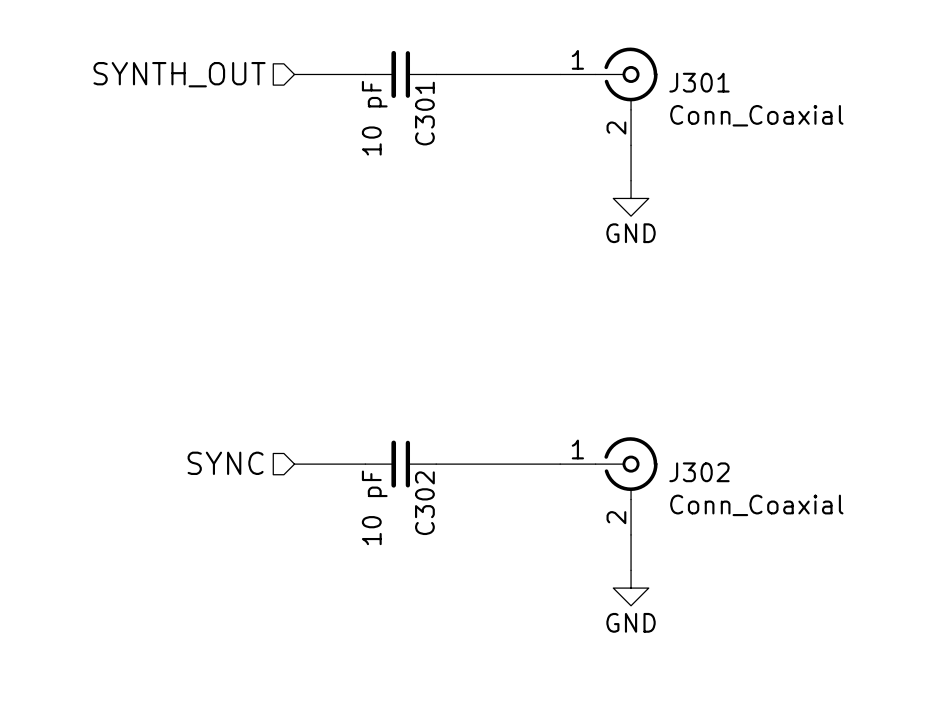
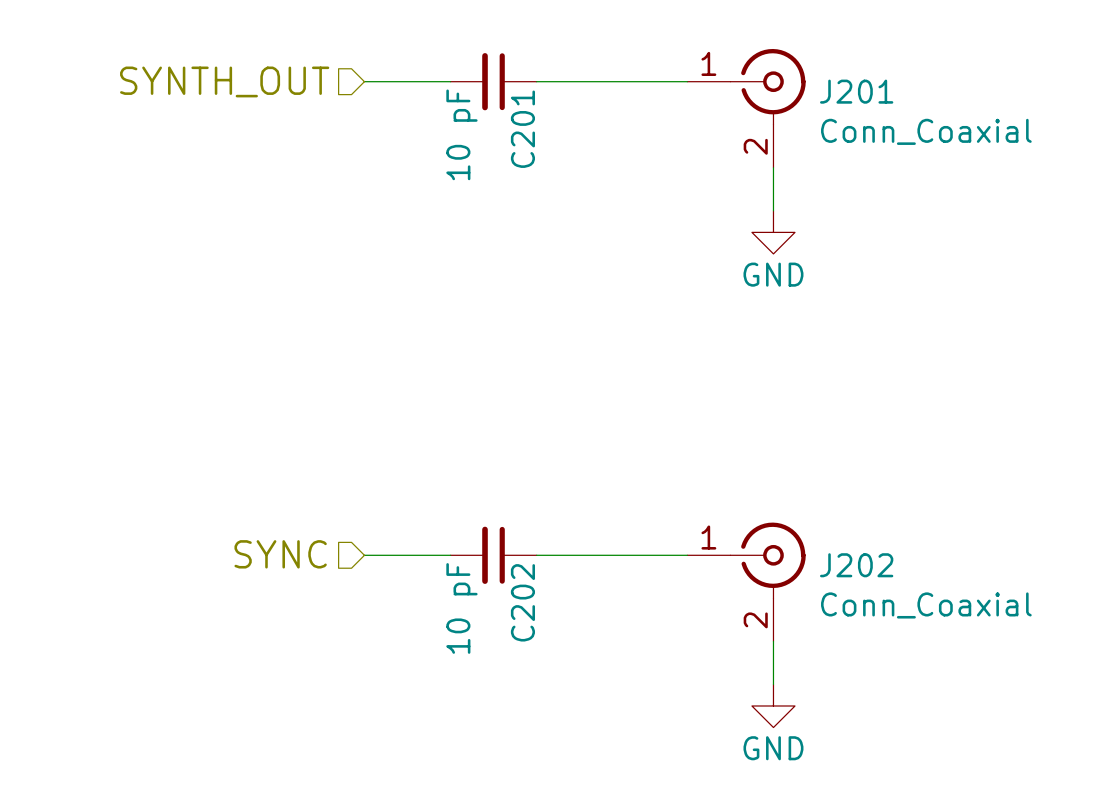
J301 name: J301 (699, 82) -> J201 (856, 91)
C301 name: C301 (424, 113) -> C201 (522, 129)
J302 name: J302 (699, 472) -> J202 (856, 565)
C302 name: C302 (424, 503) -> C202 (522, 602)

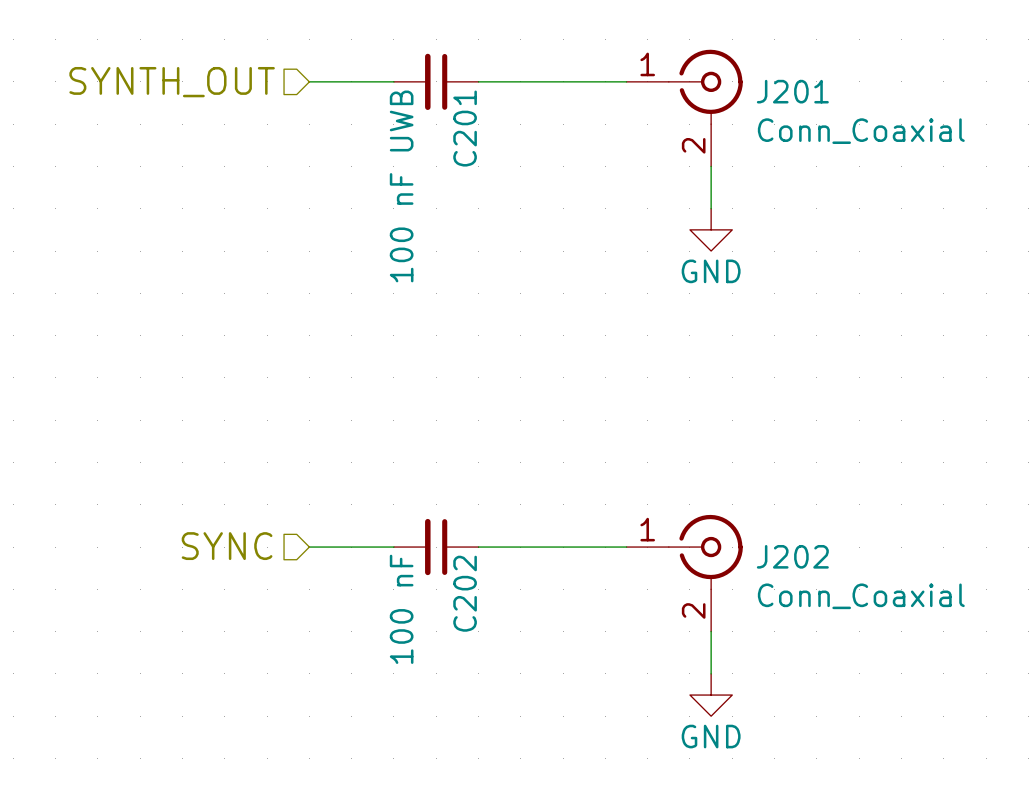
C201 value: 10 pF (461, 134) -> 100 nF UWB (401, 186)
C202 value: 10 pF (461, 608) -> 100 nF (401, 609)

